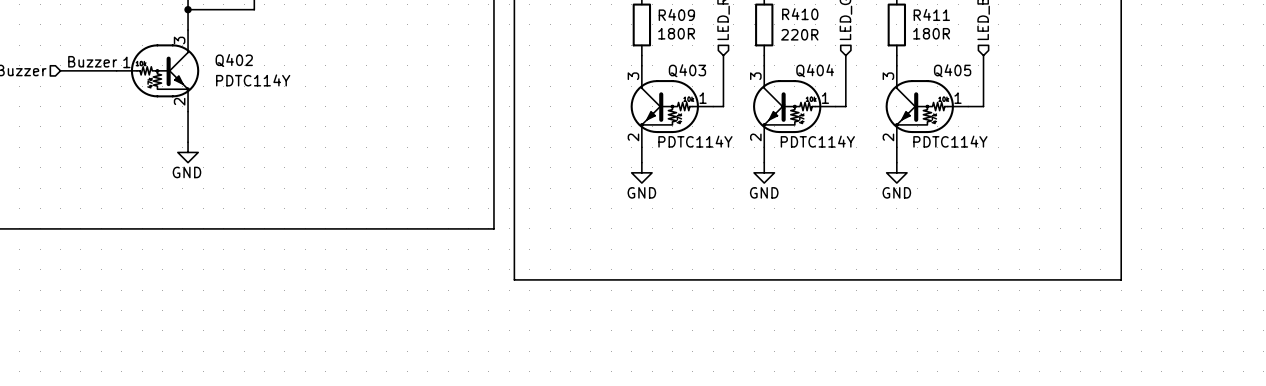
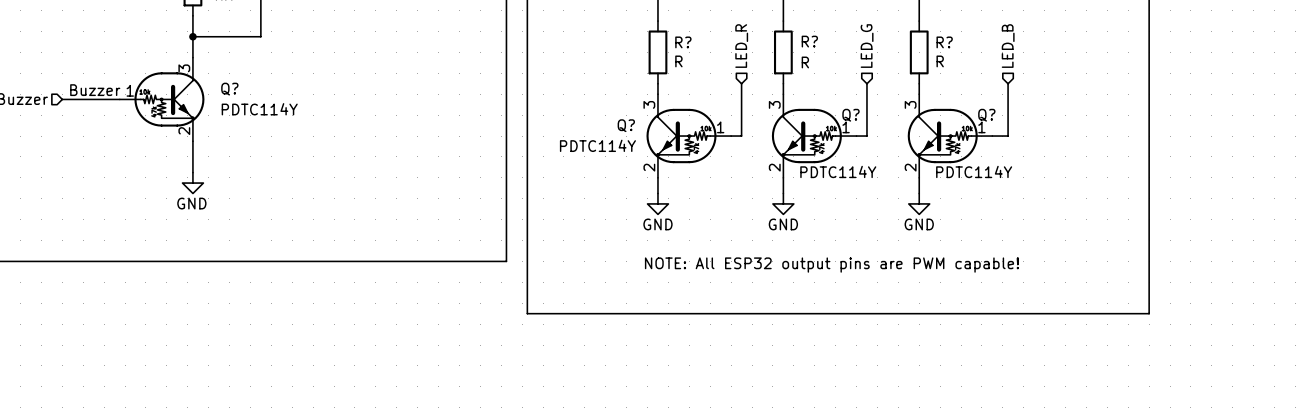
R409 name: R409 (676, 14) -> R? (683, 42)
R410 name: R410 (800, 14) -> R? (809, 41)
R411 name: R411 (931, 14) -> R? (944, 42)
R409 value: 180R (676, 33) -> R (678, 61)
R411 value: 180R (931, 33) -> R (940, 61)
R410 value: 220R (799, 34) -> R (805, 62)
Q402 name: Q402 (234, 60) -> Q? (229, 89)
Q403 name: Q403 (687, 70) -> Q? (626, 125)
Q404 name: Q404 (815, 70) -> Q? (850, 115)
Q405 name: Q405 (952, 70) -> Q? (986, 115)
Q403 value position: PDTC114Y (695, 141) -> PDTC114Y (597, 145)
text: none -> NOTE: All ESP32 output pins are PWM capable! (831, 265)

